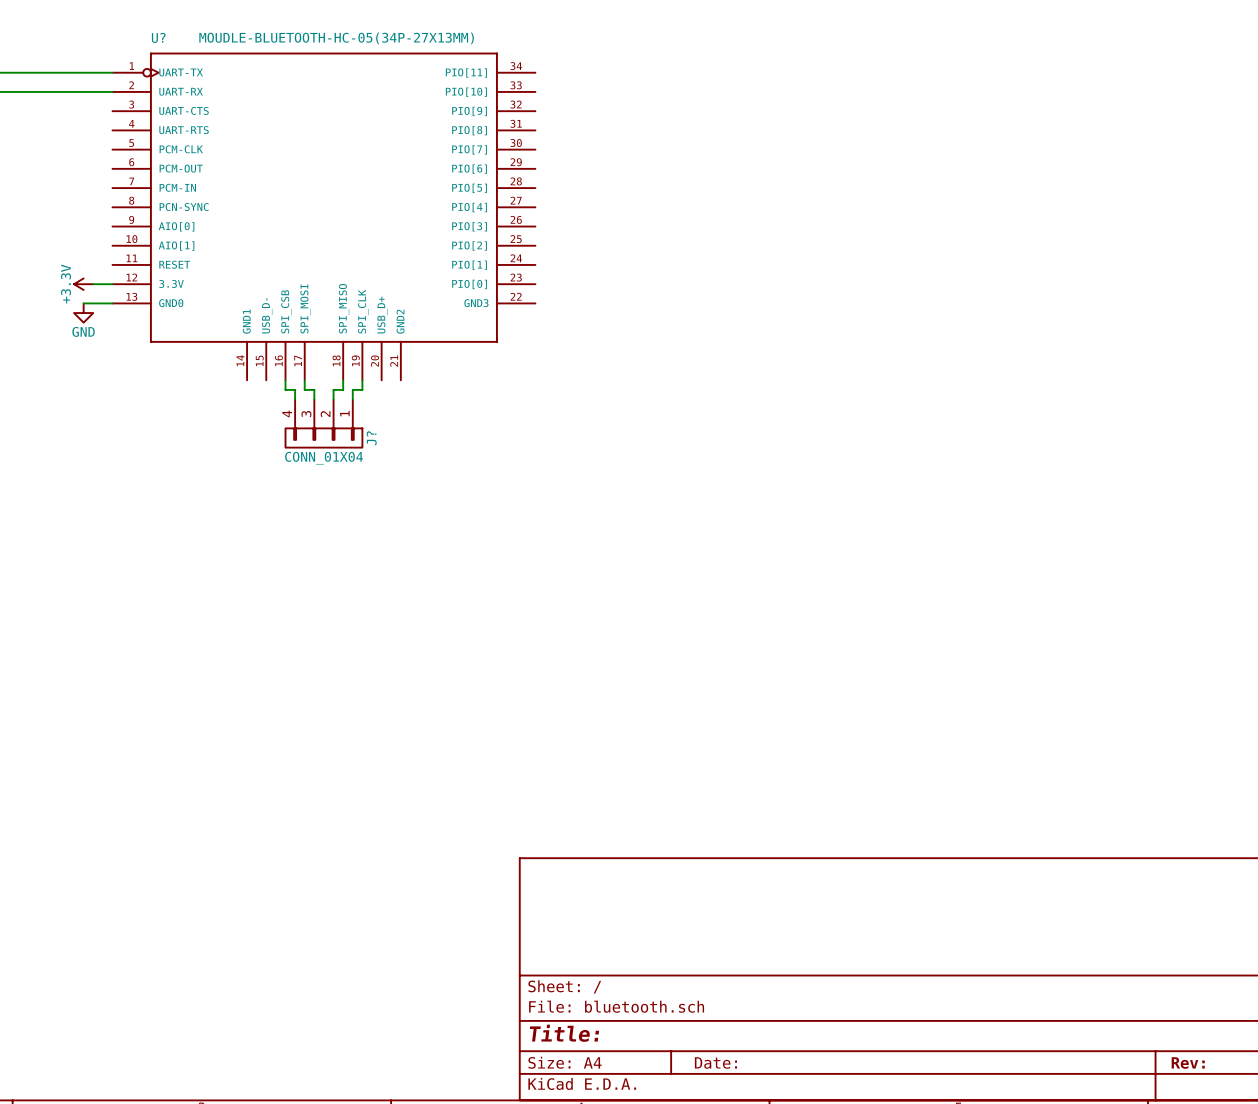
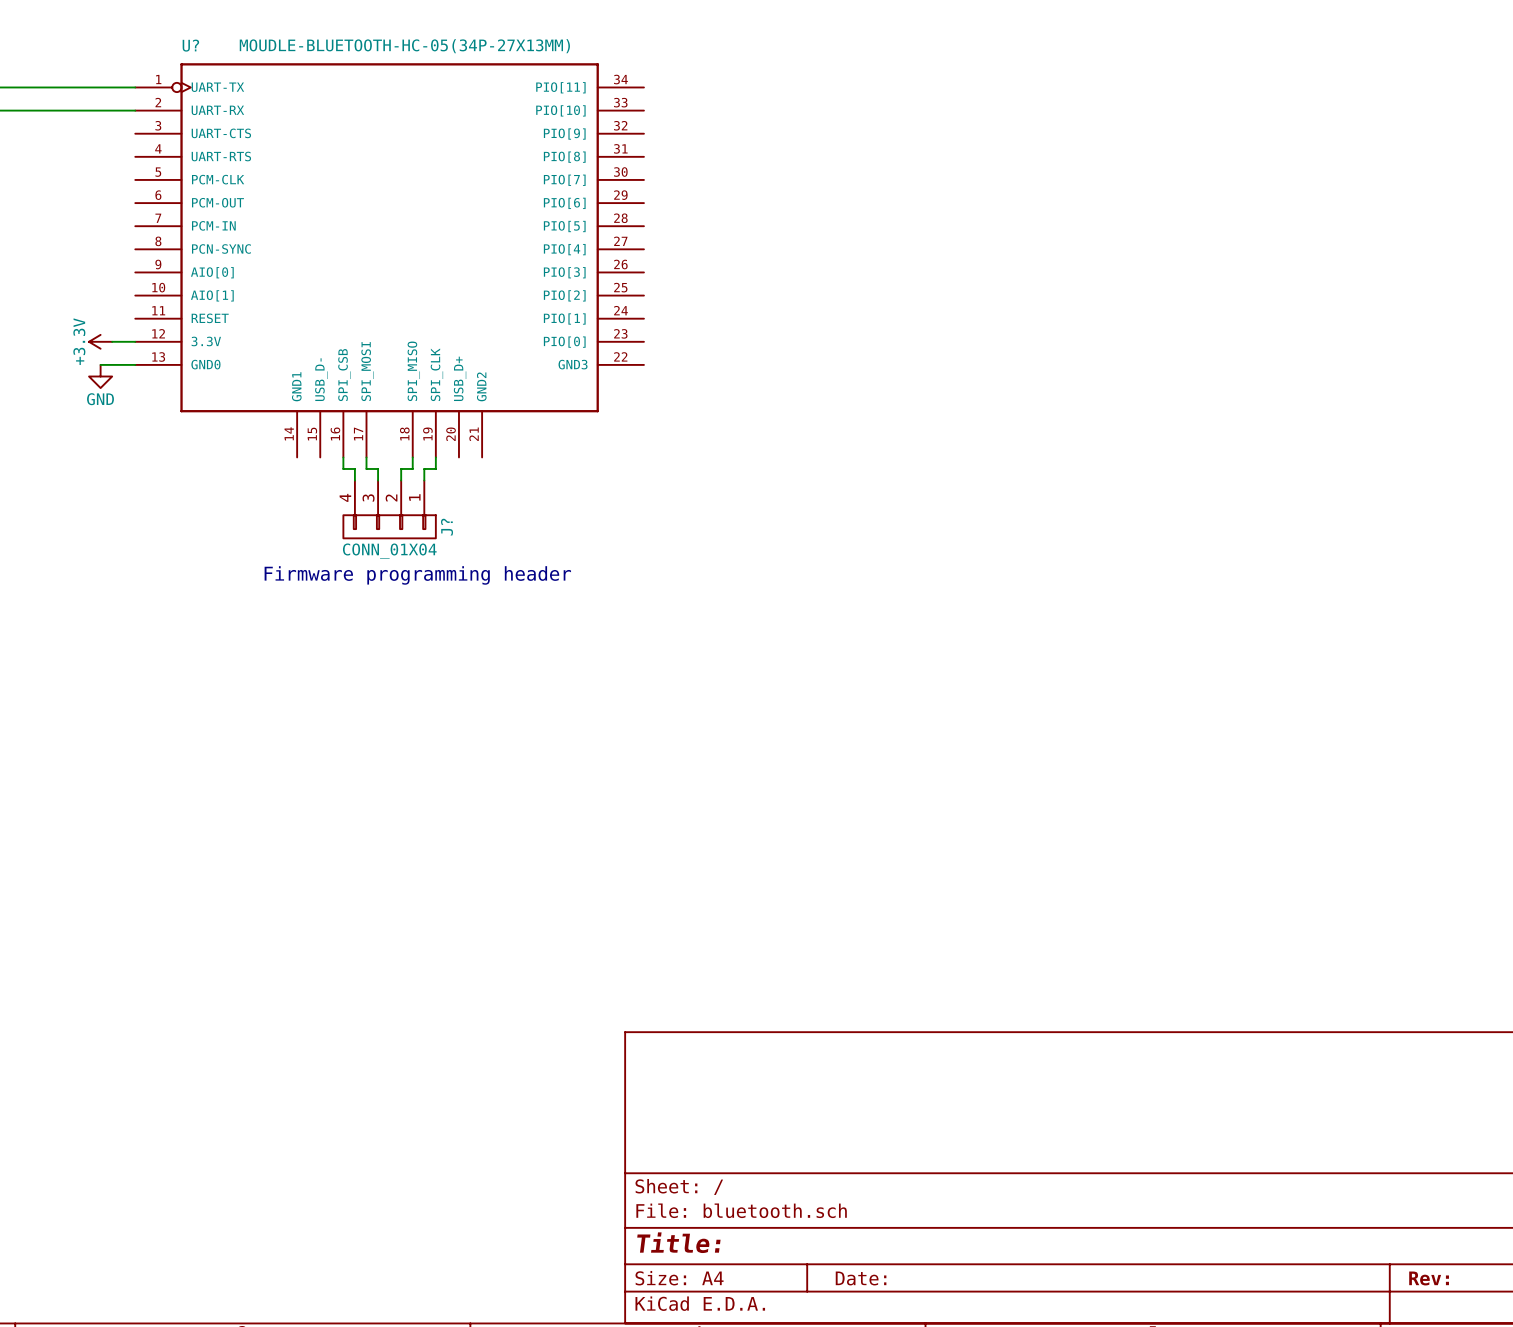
text: none -> Firmware programming header (417, 575)

